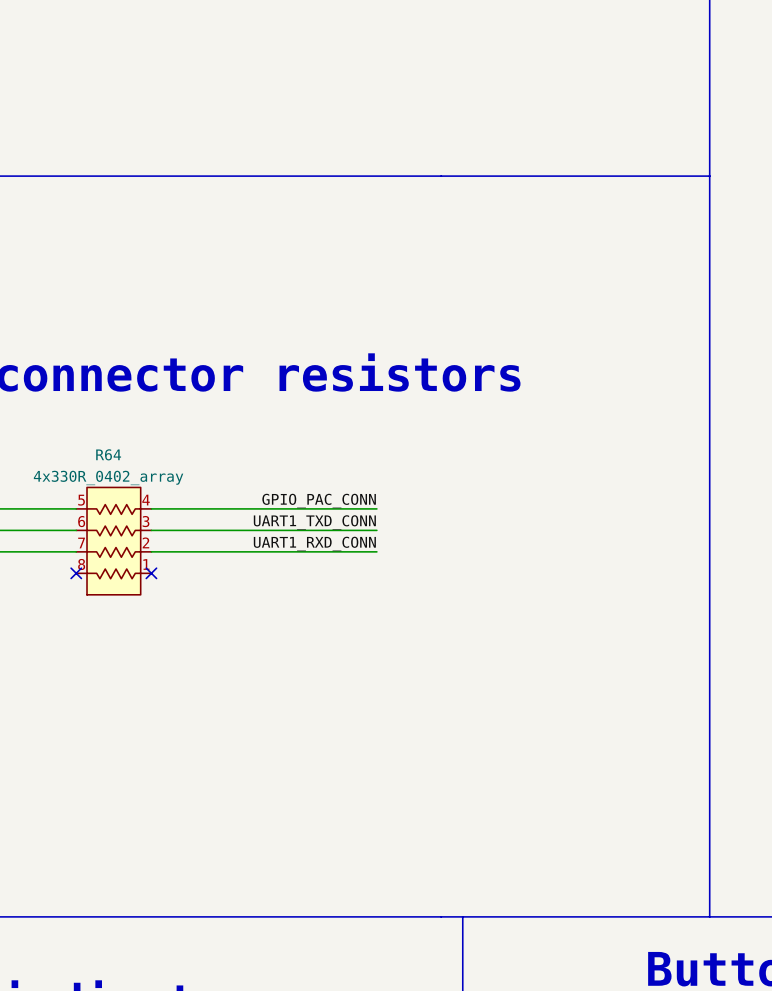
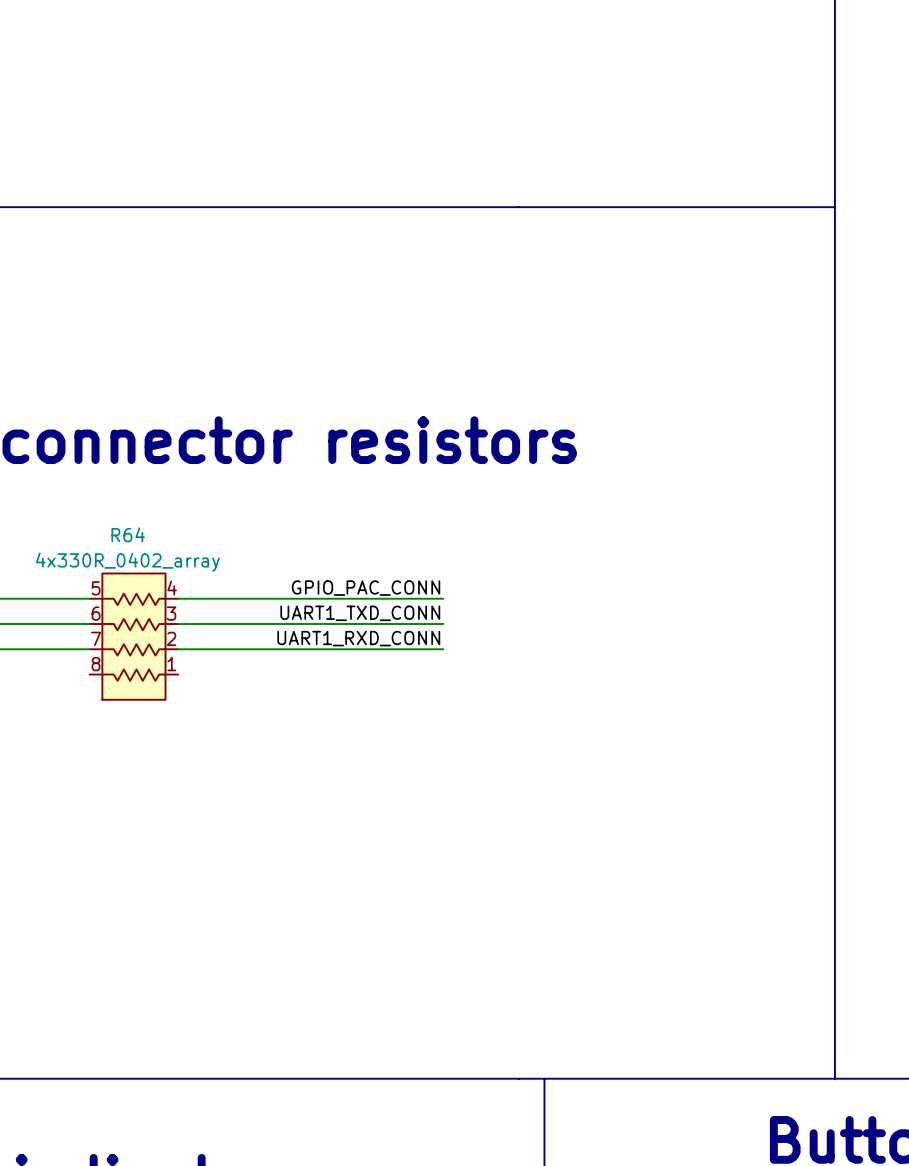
no-connect mark: (76, 573) -> none
no-connect mark: (151, 573) -> none

